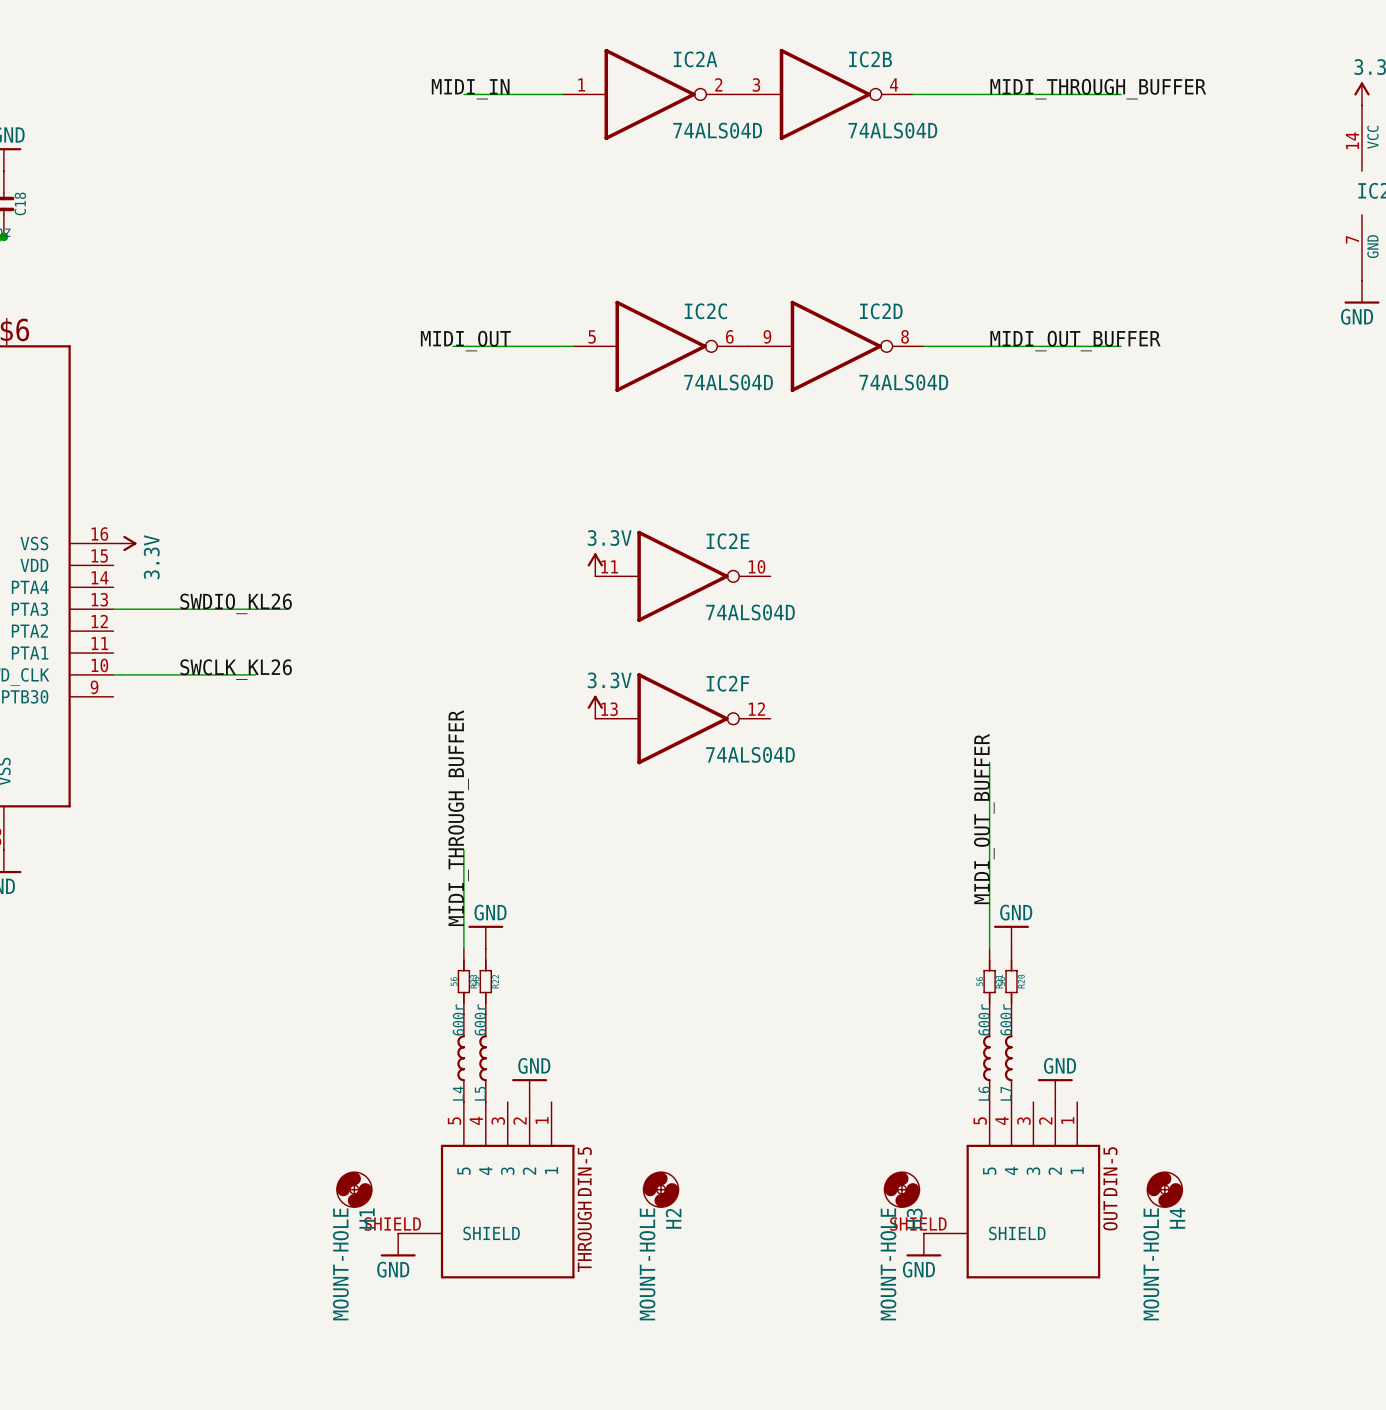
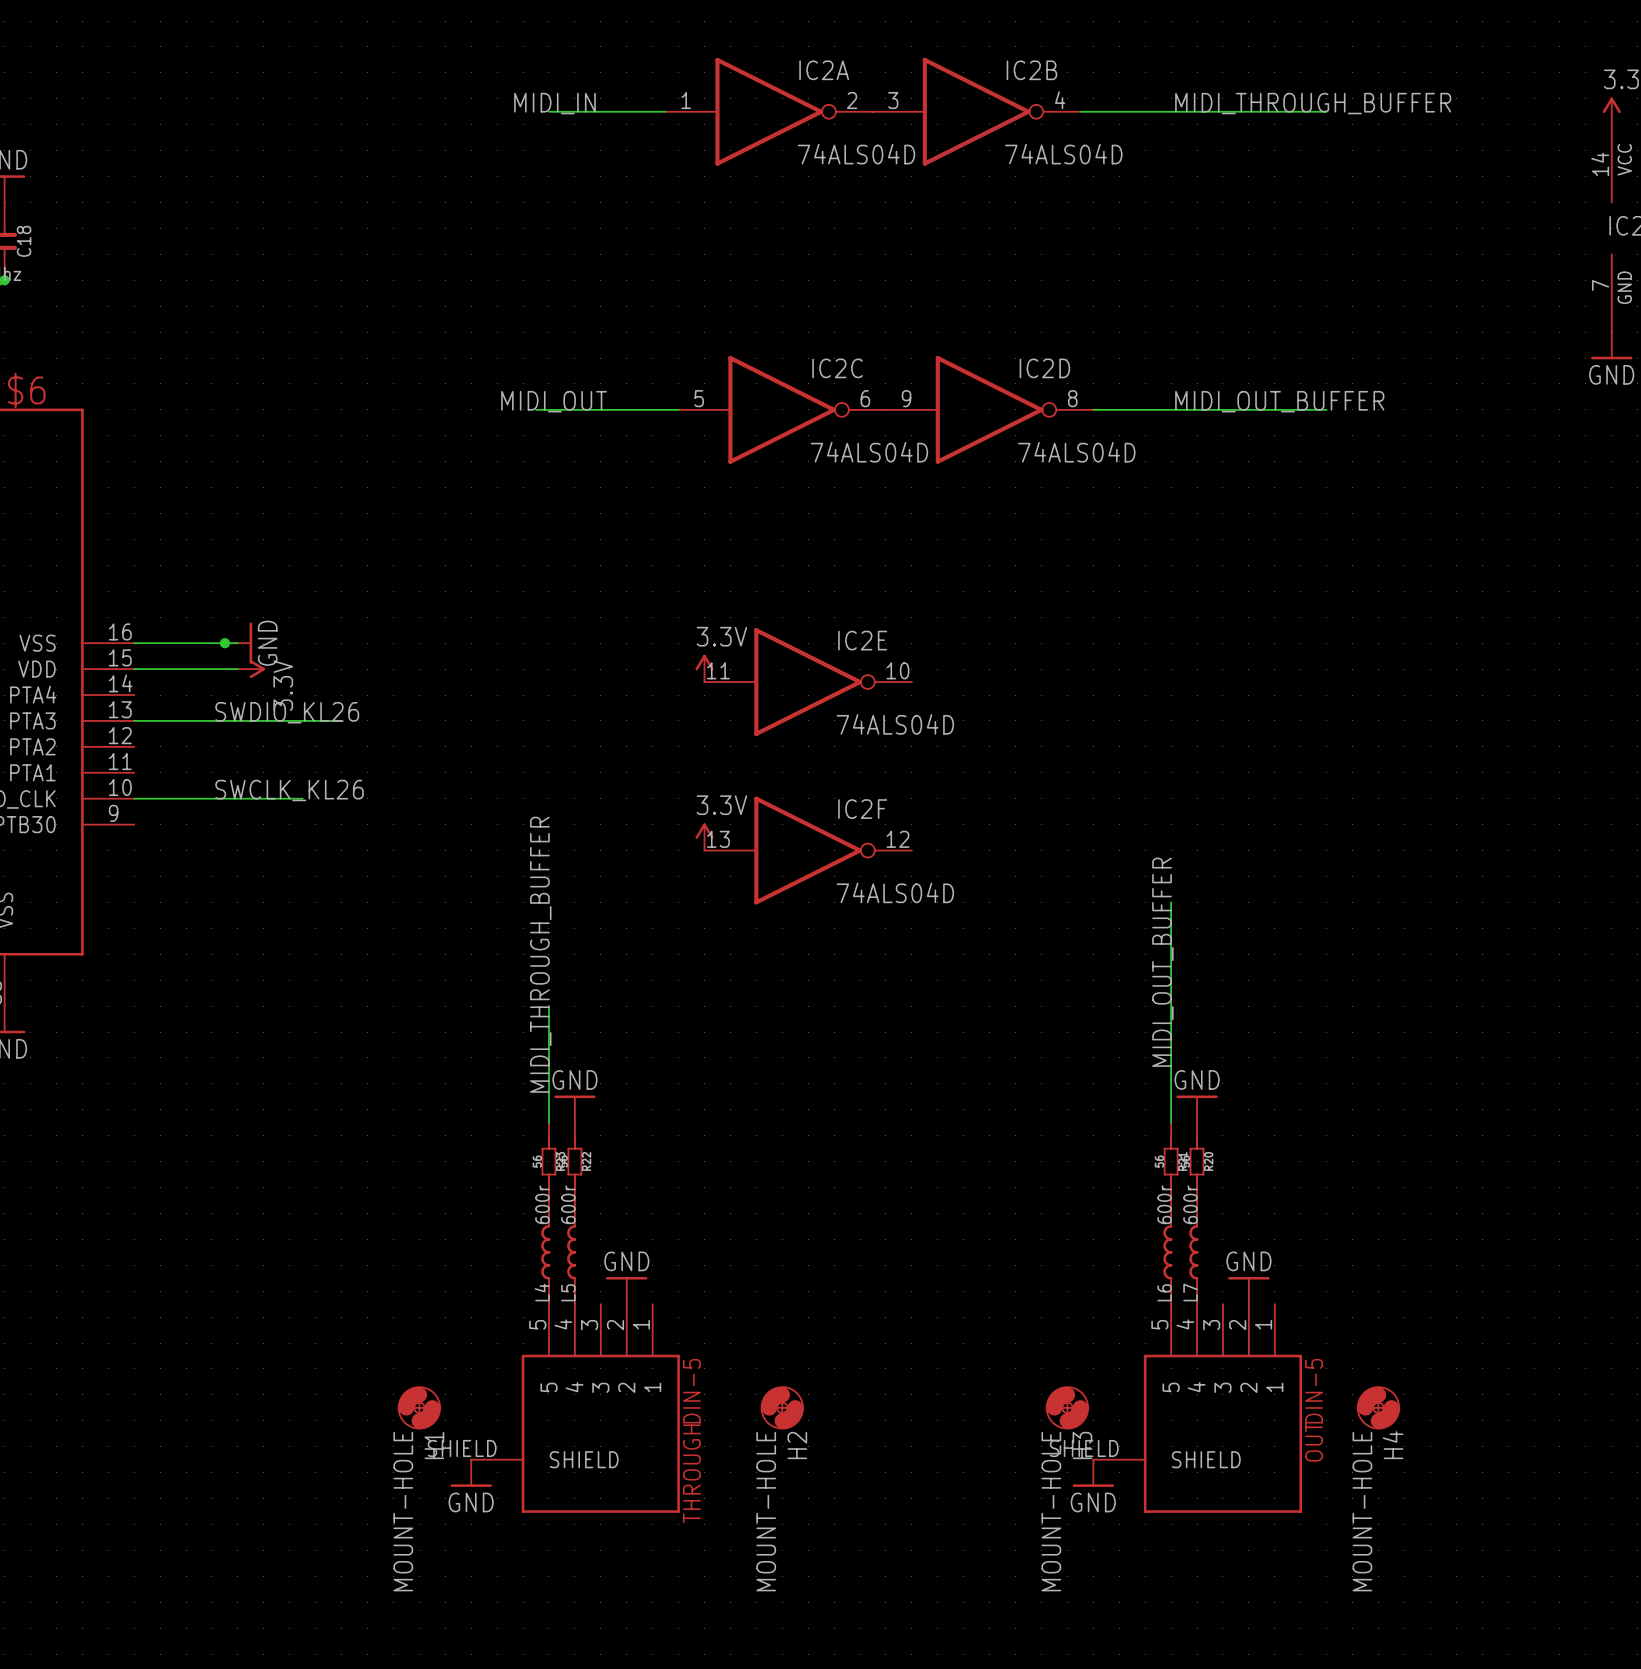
wire: none -> (134, 643) (237, 643)
power symbol position: 3.3V (124, 543) -> 3.3V (251, 669)
junction: none -> (224, 643)
power symbol: none -> GND (238, 643)
wire: none -> (134, 669) (237, 669)

